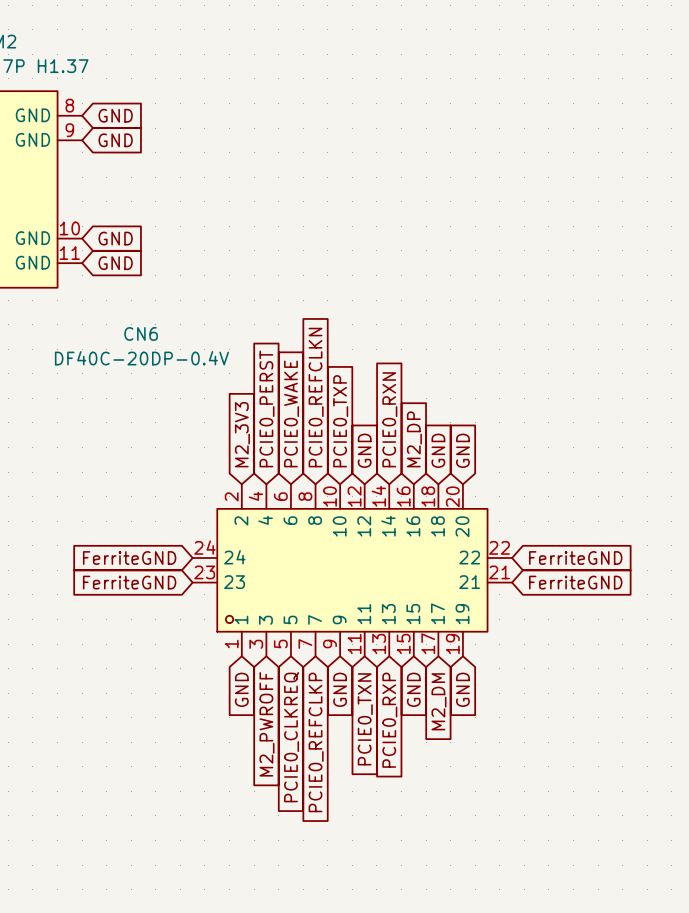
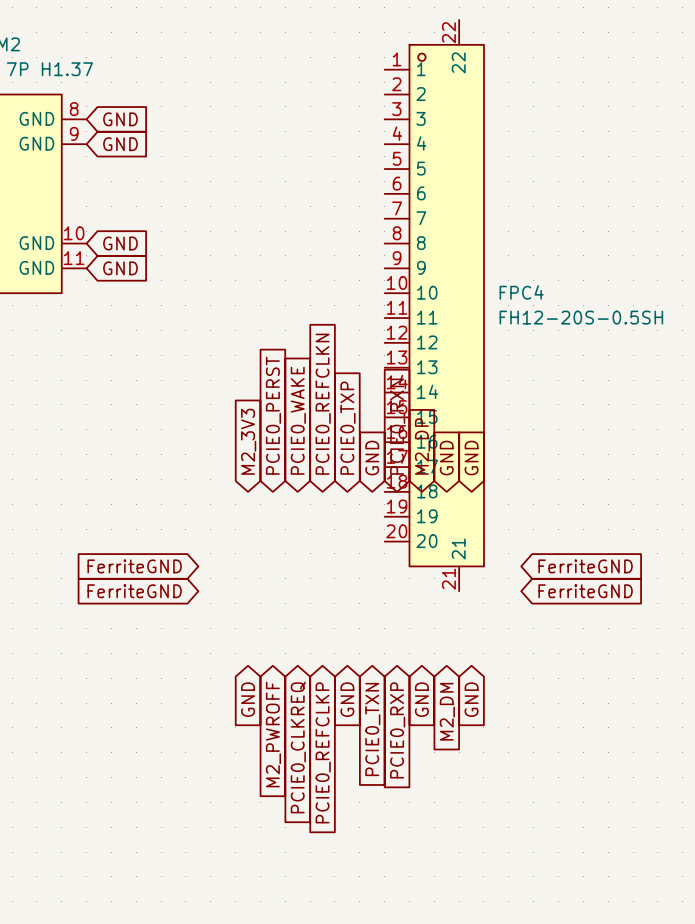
FPC4: none -> FH12-20S-0.5SH (434, 305)
CN6: DF40C-20DP-0.4V (352, 570) -> none

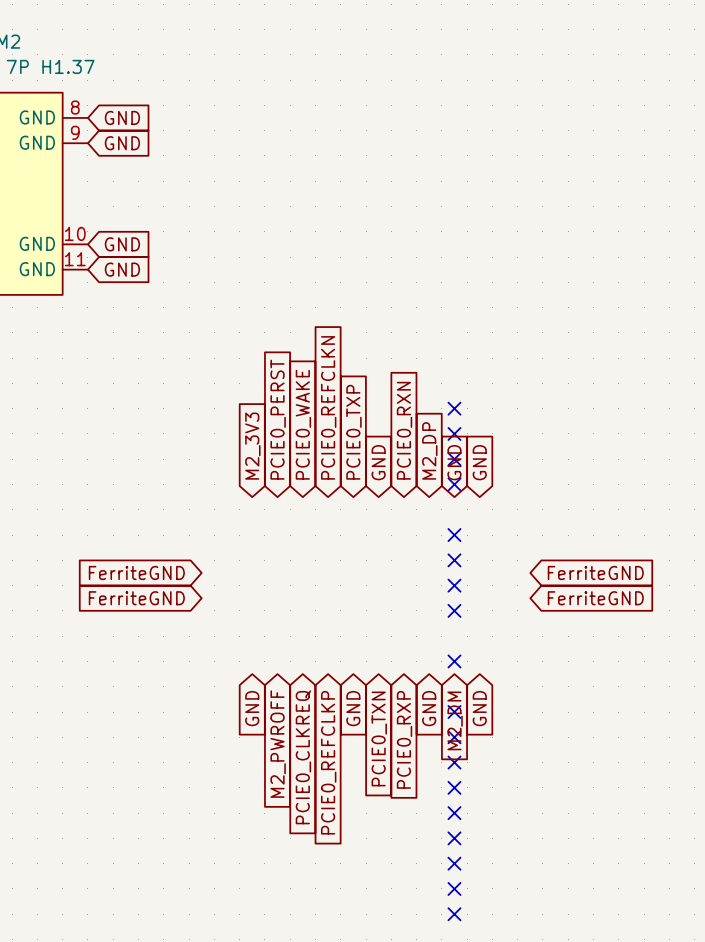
FPC4: FH12-20S-0.5SH (434, 305) -> none
no-connect mark: none -> (454, 408)
no-connect mark: none -> (454, 433)
no-connect mark: none -> (454, 459)
no-connect mark: none -> (454, 484)
no-connect mark: none -> (454, 535)
no-connect mark: none -> (454, 560)
no-connect mark: none -> (454, 585)
no-connect mark: none -> (454, 610)
no-connect mark: none -> (454, 661)
no-connect mark: none -> (454, 712)
no-connect mark: none -> (454, 737)
no-connect mark: none -> (454, 762)
no-connect mark: none -> (454, 787)
no-connect mark: none -> (454, 813)
no-connect mark: none -> (454, 838)
no-connect mark: none -> (454, 863)
no-connect mark: none -> (454, 888)
no-connect mark: none -> (454, 914)

